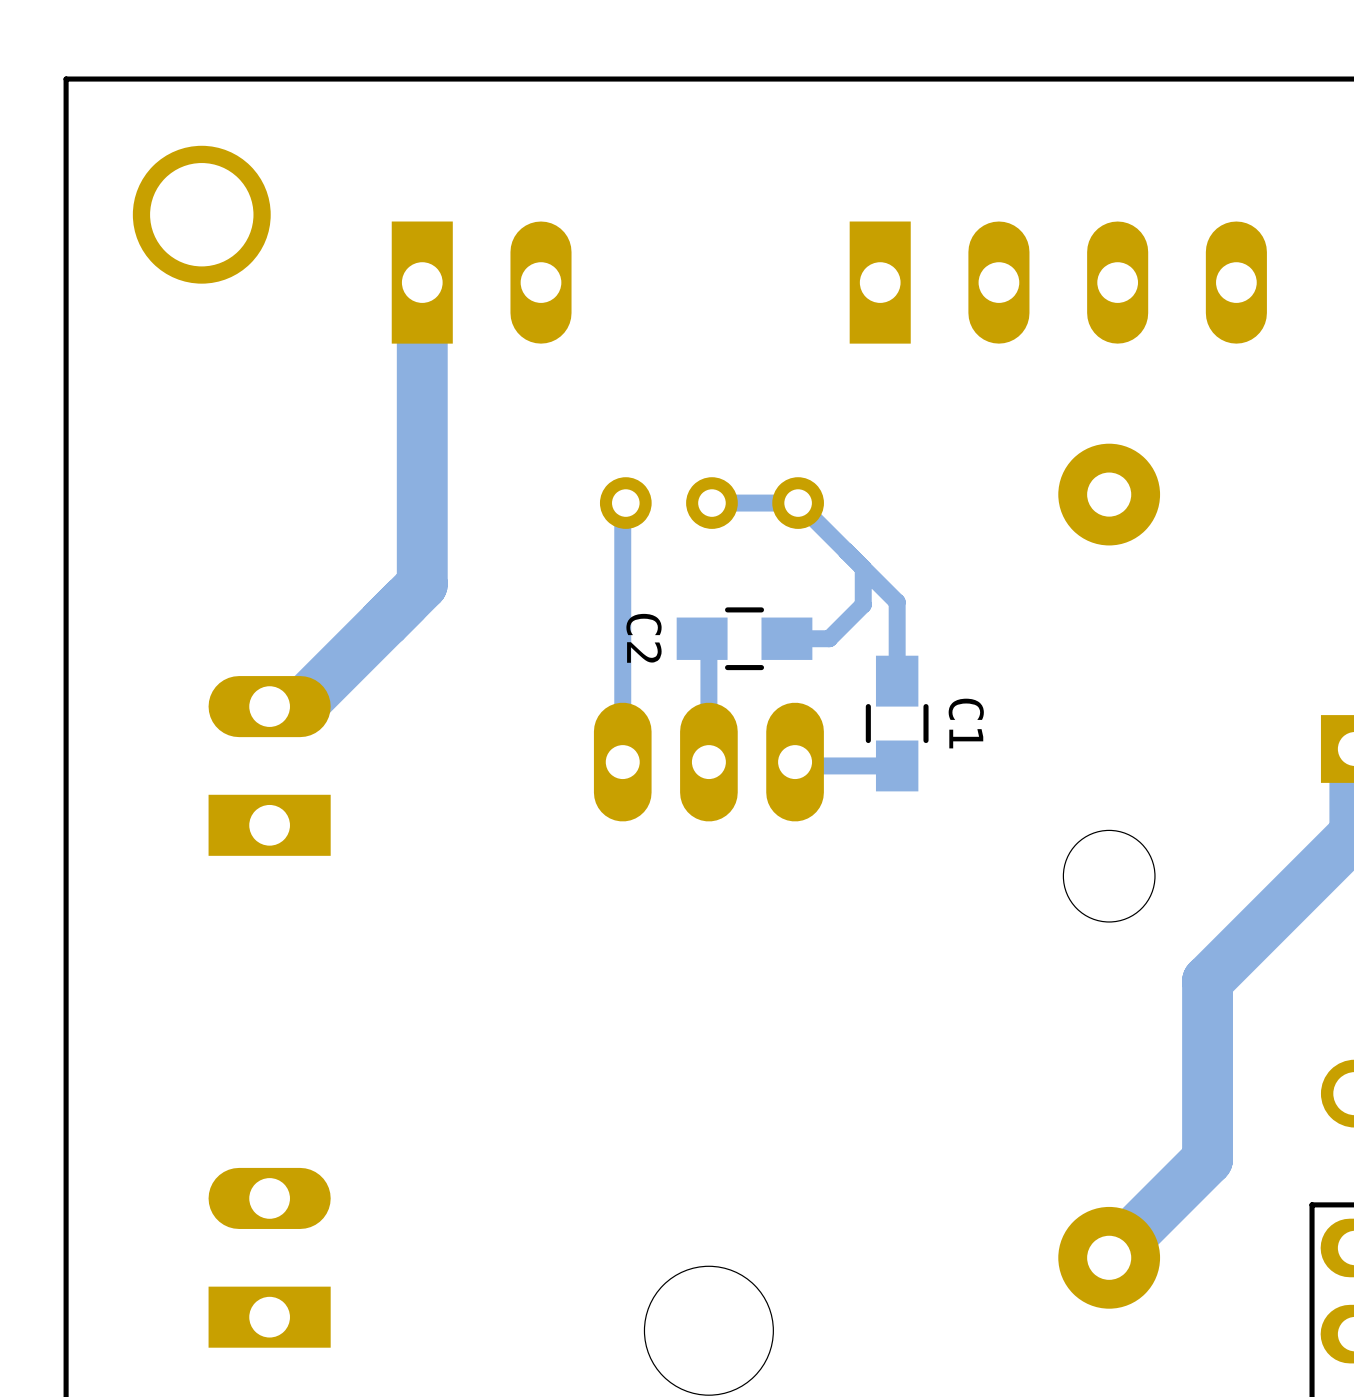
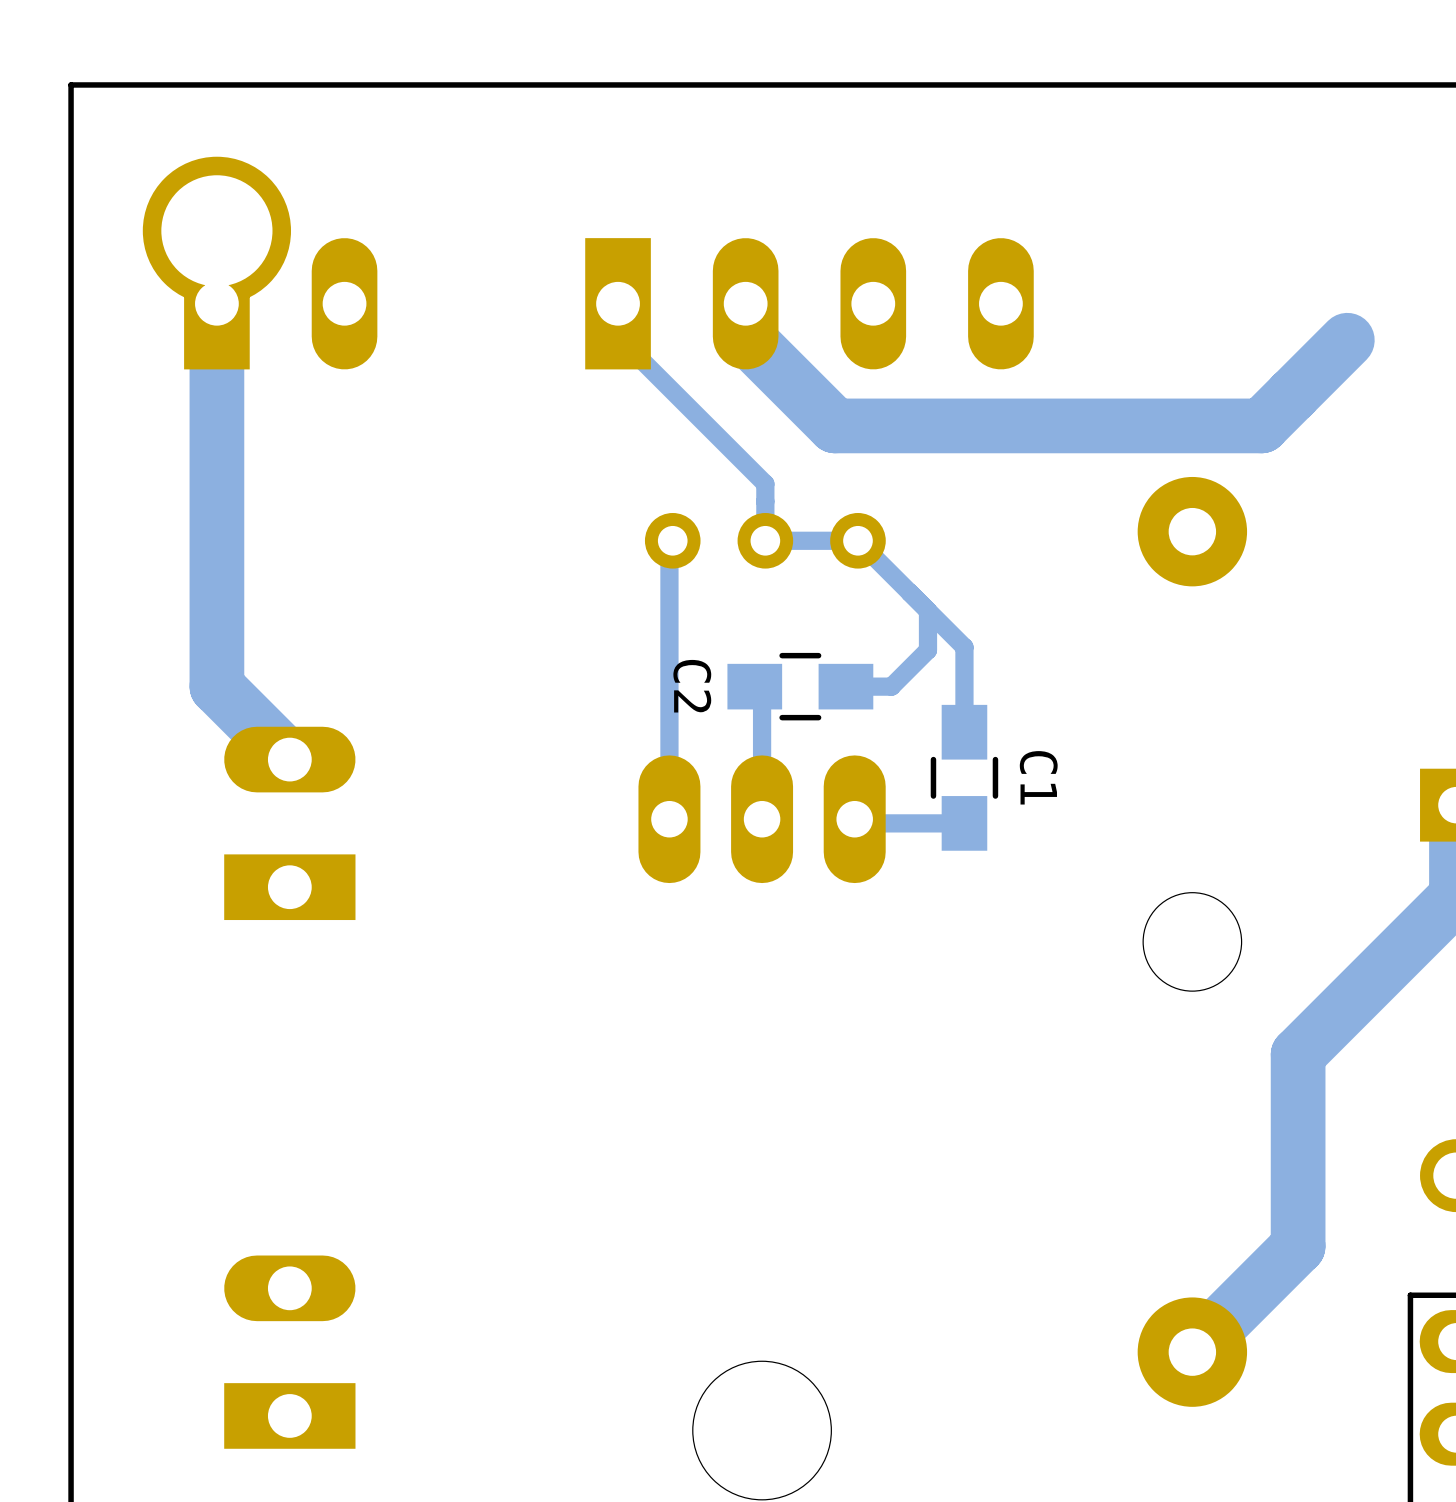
track: (422, 282) (422, 584) (300, 706) (269, 706) -> (216, 303) (216, 686) (289, 759)
part position: (481, 282) -> (280, 303)
track: none -> (618, 303) (618, 336) (765, 483) (765, 540)
track: none -> (745, 303) (745, 336) (835, 425) (1261, 425) (1347, 340)
part position: (1058, 282) -> (809, 303)

